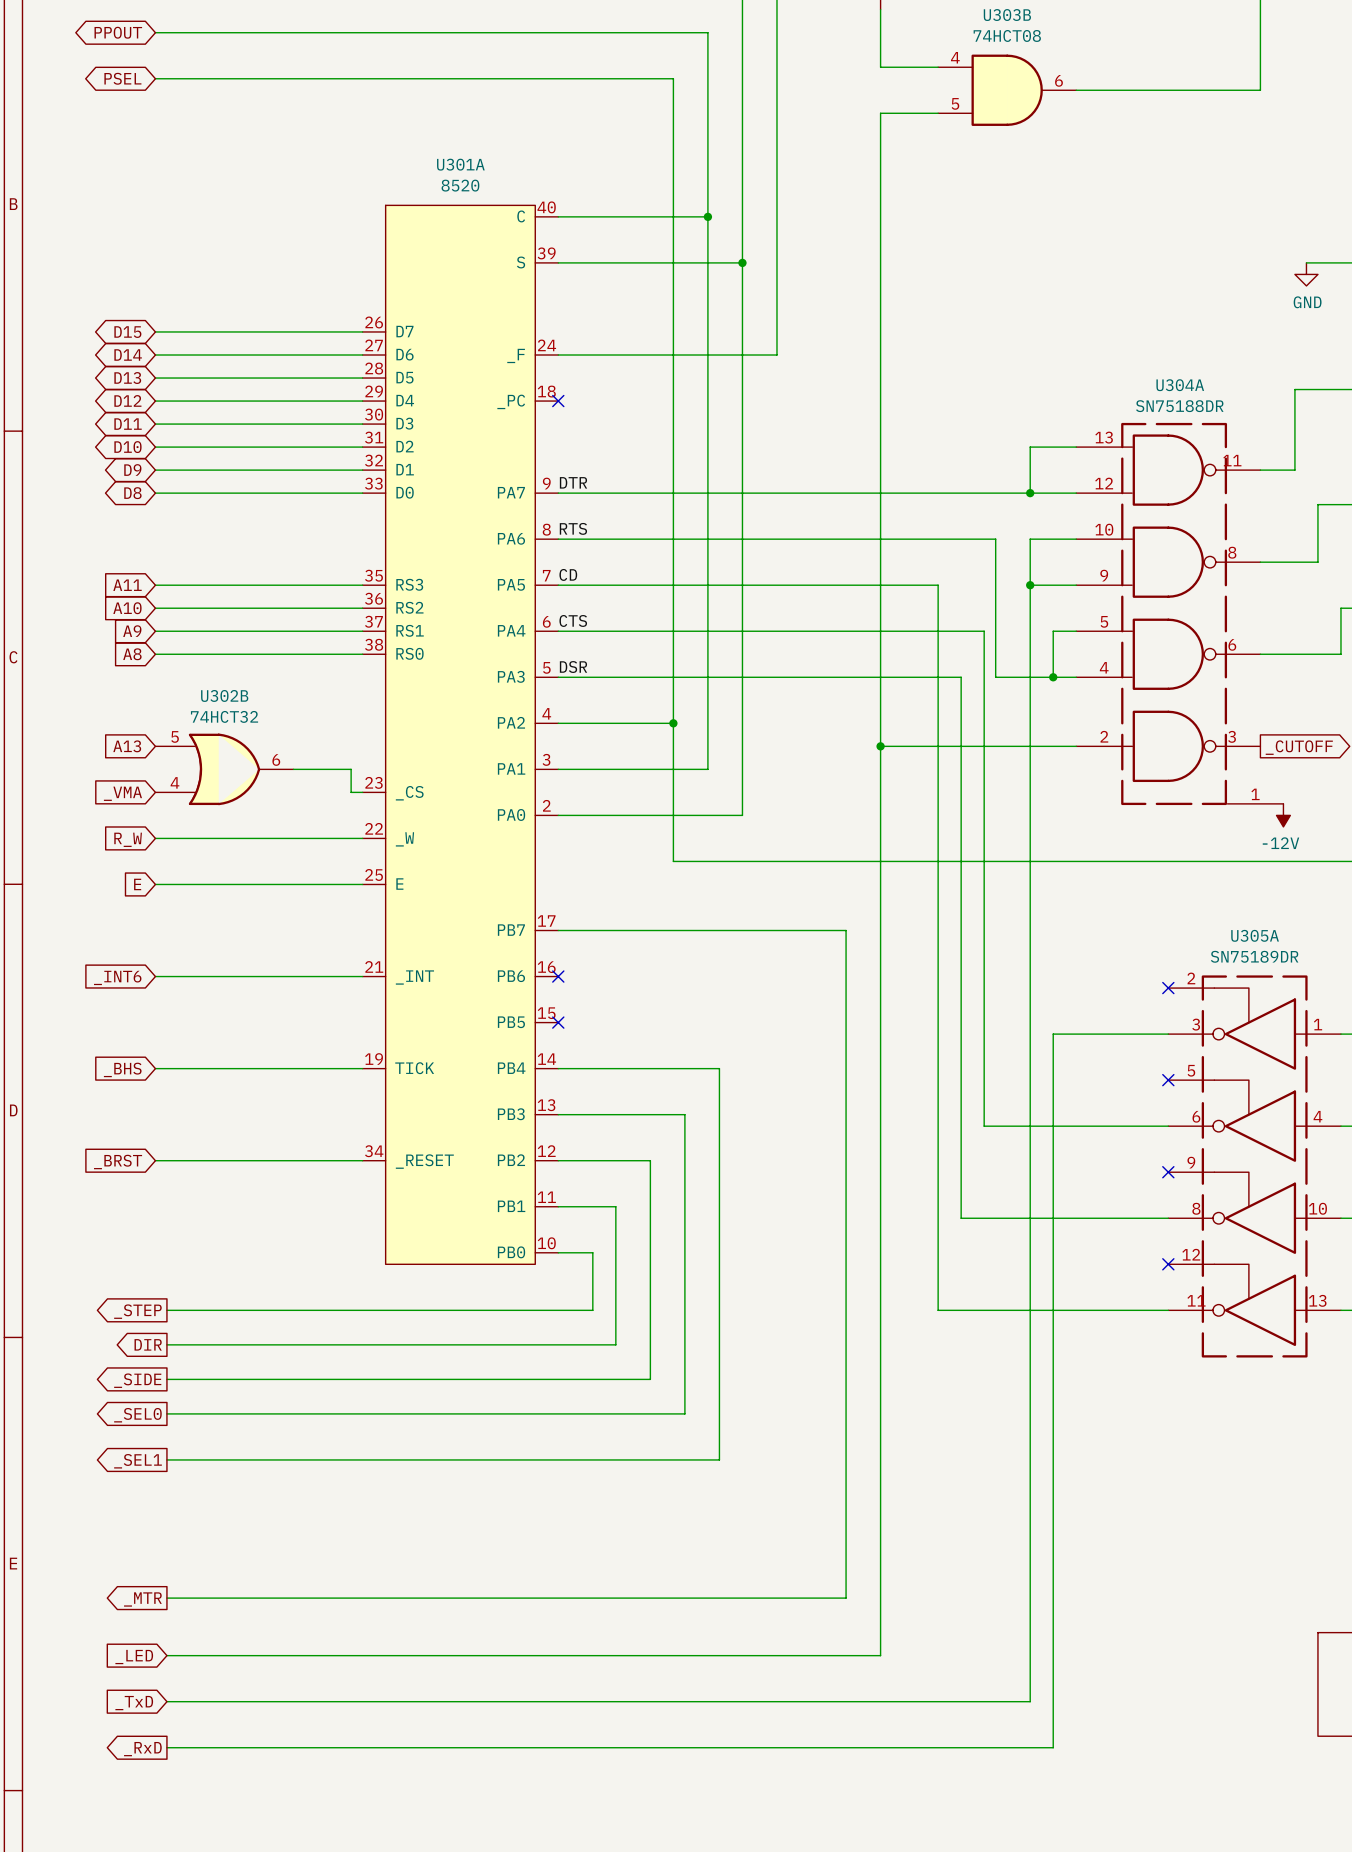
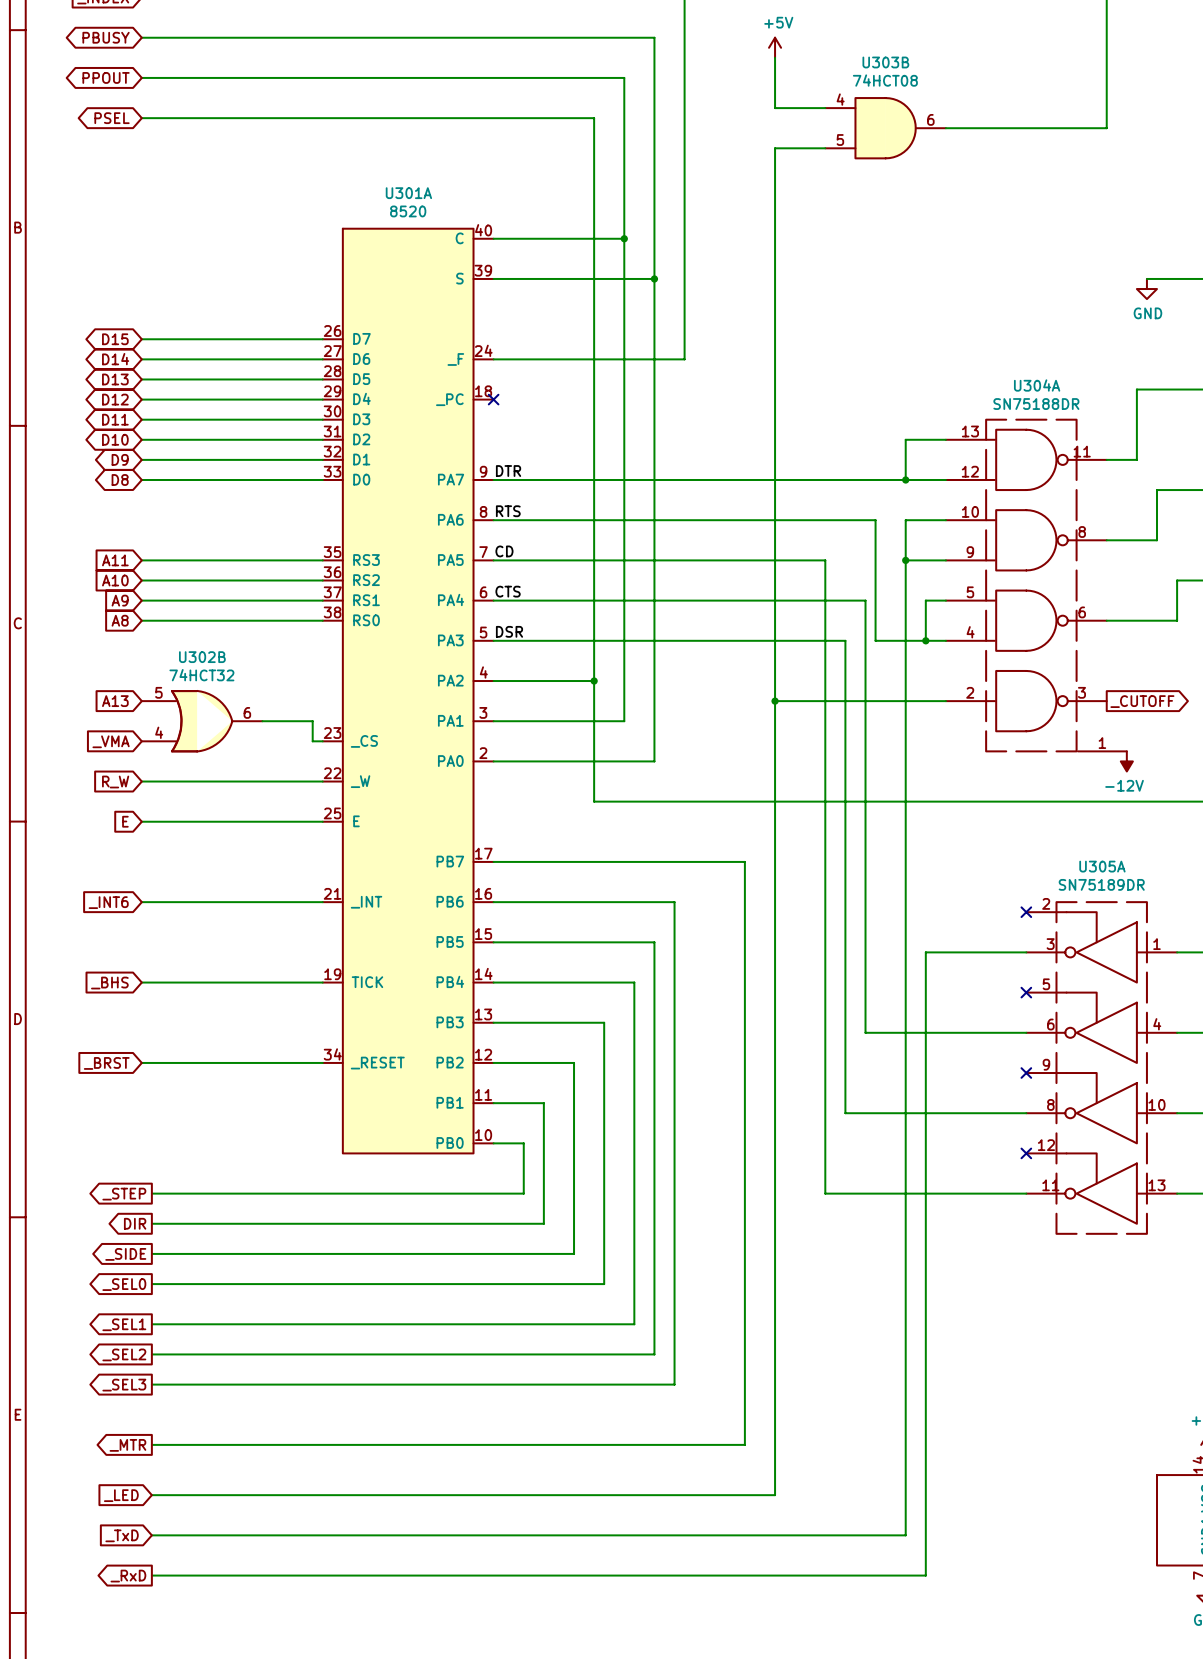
wire: none -> (493, 902) (674, 902) (674, 1384) (151, 1384)
no-connect mark: (558, 976) -> none
wire: none -> (493, 942) (654, 942) (654, 1354) (151, 1354)
no-connect mark: (558, 1022) -> none
global label: none -> _SEL2 (124, 1354)
global label: none -> _SEL3 (124, 1385)

